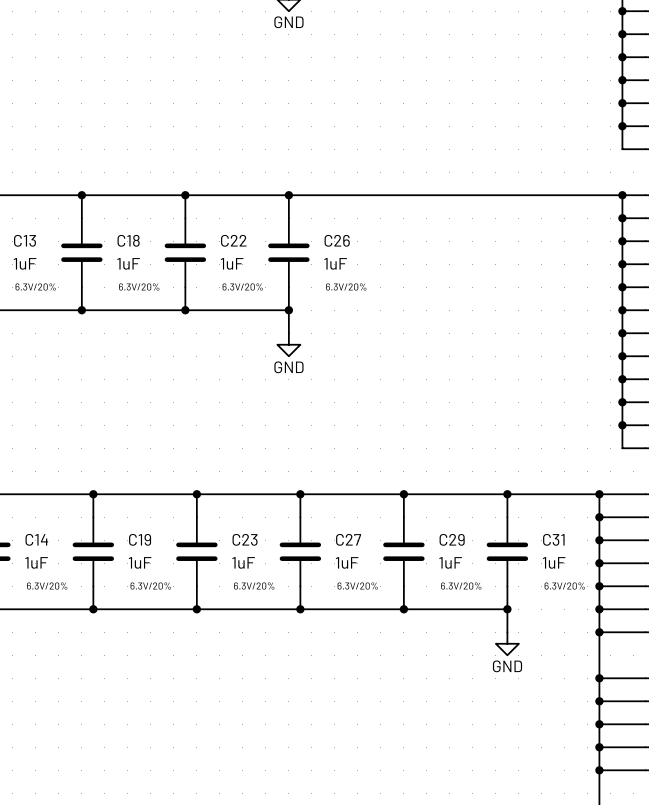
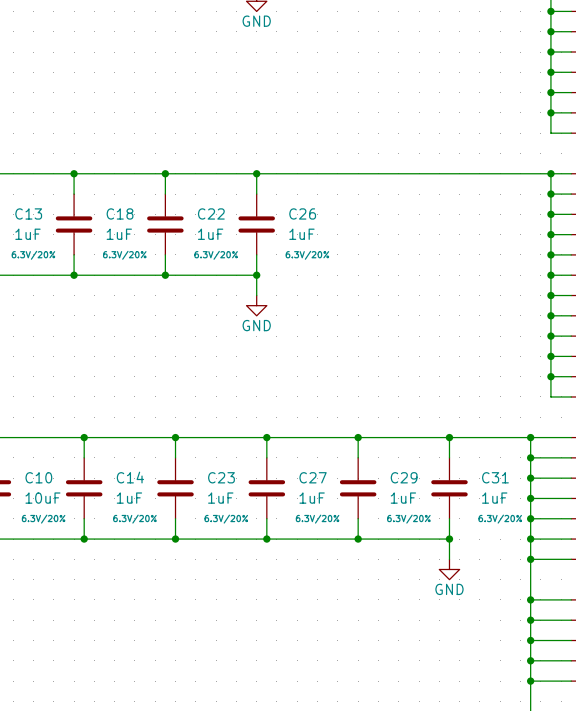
C14 name: C14 (36, 539) -> C10 (38, 477)
C19 name: C19 (140, 539) -> C14 (130, 477)
C14 value: 1uF (36, 562) -> 10uF (42, 498)

